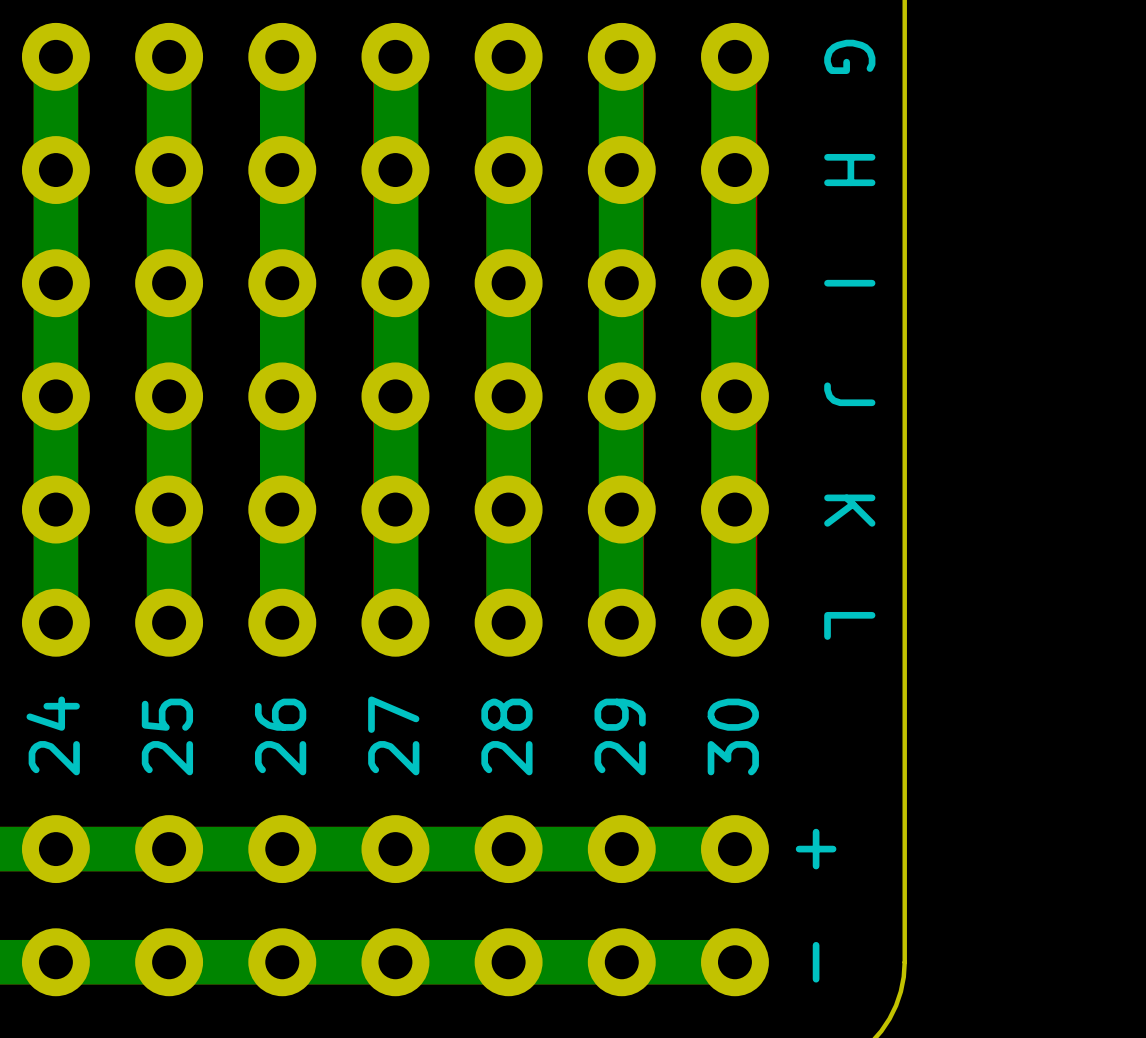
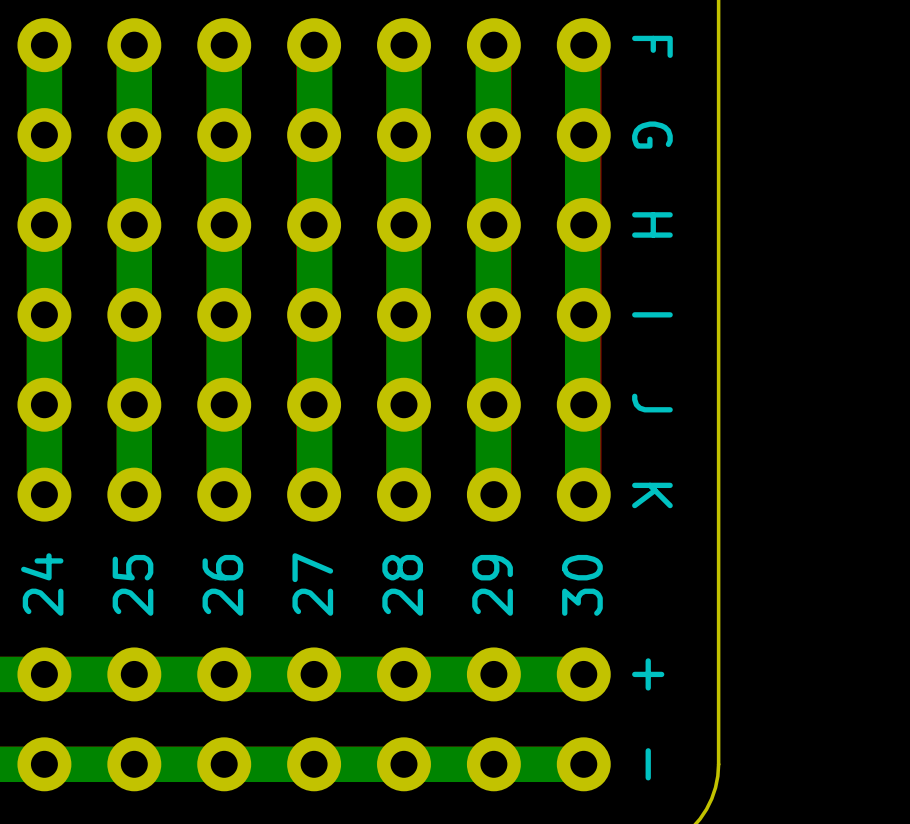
text: G (849, 56) -> F (652, 46)
text: H (849, 170) -> G (652, 135)
text: I (849, 283) -> H (652, 224)
text: J (849, 394) -> I (652, 314)
text: K (849, 510) -> J (652, 403)
text: L (849, 625) -> K (652, 495)

